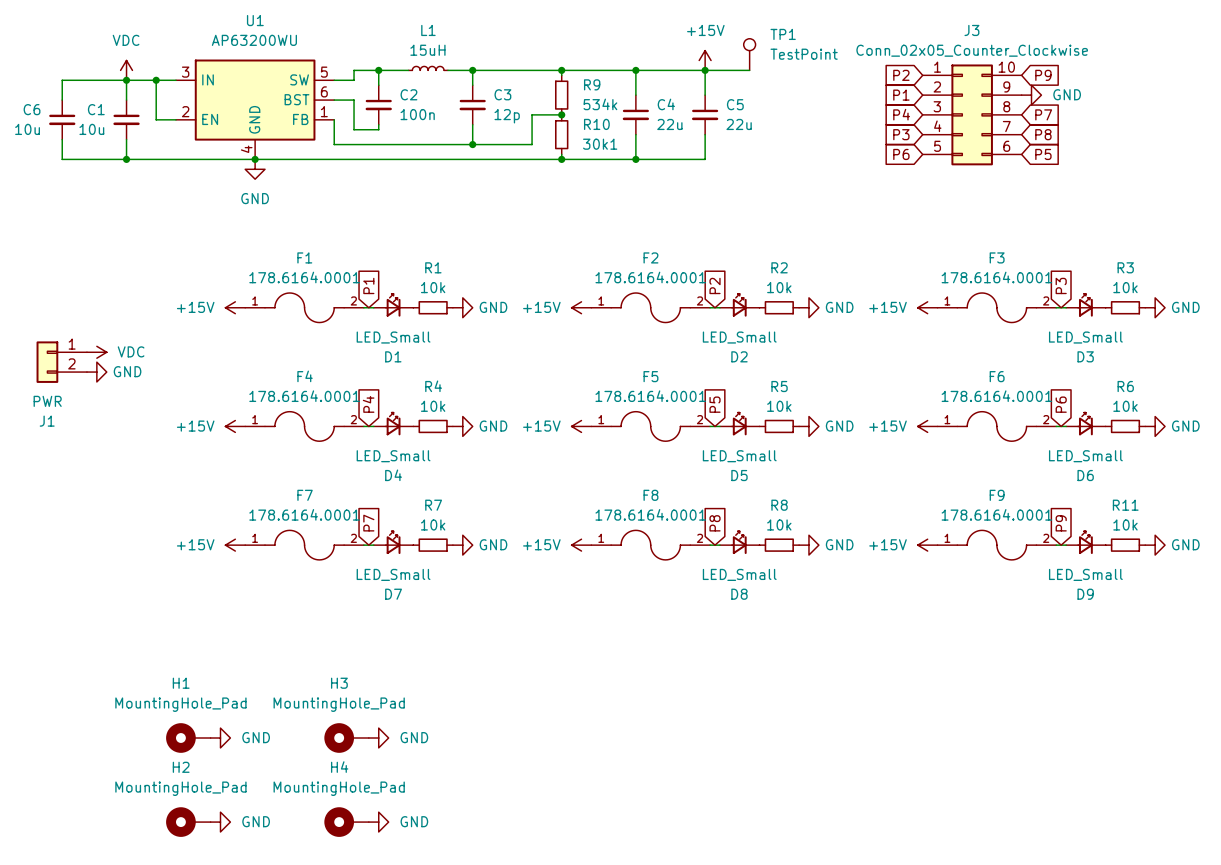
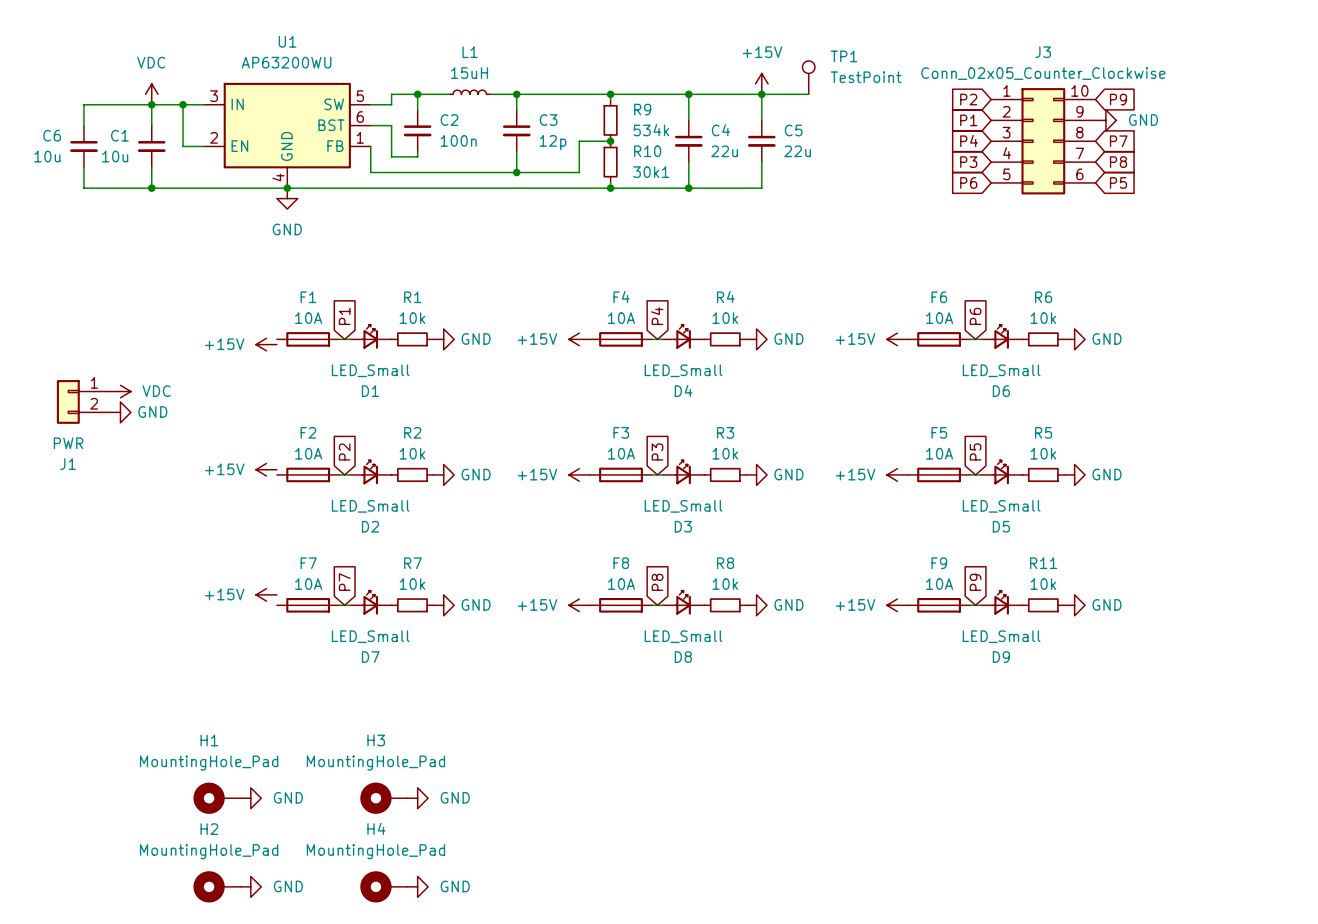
F1 value: 178.6164.0001 (304, 277) -> 10A (308, 318)
F2 value: 178.6164.0001 (650, 277) -> 10A (308, 453)
F3 value: 178.6164.0001 (996, 277) -> 10A (621, 453)
global label: none -> P4 (657, 316)
global label: none -> P6 (975, 316)
global label position: P1 (368, 285) -> P1 (344, 316)
global label: P2 (715, 285) -> none
global label: P3 (1061, 285) -> none
F1 symbol: [245, 292, 364, 324] -> [276, 332, 340, 347]
F2 symbol: [591, 292, 711, 324] -> [276, 467, 340, 483]
F3 symbol: [937, 292, 1057, 324] -> [589, 467, 653, 483]
power symbol: none -> GND (756, 339)
power symbol: none -> +15V (897, 339)
power symbol: none -> GND (1074, 339)
D1 position: (393, 305) -> (370, 336)
D2 position: (739, 305) -> (370, 472)
D3 position: (1085, 305) -> (683, 472)
wire: (363, 307) (373, 307) -> (339, 339) (349, 339)
R1 position: (433, 307) -> (412, 339)
power symbol position: GND (462, 307) -> GND (443, 339)
power symbol position: +15V (581, 307) -> +15V (579, 339)
wire: (710, 307) (719, 307) -> (652, 339) (662, 339)
R2 position: (779, 307) -> (412, 474)
power symbol: GND (808, 307) -> none
power symbol: +15V (927, 307) -> none
wire: (1056, 307) (1066, 307) -> (970, 339) (980, 339)
R3 position: (1125, 307) -> (725, 474)
power symbol: GND (1155, 307) -> none
F4 value: 178.6164.0001 (304, 396) -> 10A (621, 318)
F5 value: 178.6164.0001 (650, 396) -> 10A (939, 453)
F6 value: 178.6164.0001 (996, 396) -> 10A (939, 318)
global label: P4 (368, 404) -> none
global label position: P5 (715, 404) -> P5 (975, 451)
global label: P6 (1061, 404) -> none
global label: none -> P2 (344, 451)
global label: none -> P3 (657, 451)
F4 symbol: [245, 411, 364, 442] -> [589, 332, 653, 347]
F5 symbol: [591, 411, 711, 442] -> [907, 467, 971, 483]
F6 symbol: [937, 411, 1057, 442] -> [907, 332, 971, 347]
D4 position: (393, 423) -> (683, 336)
D5 position: (739, 423) -> (1001, 472)
D6 position: (1085, 423) -> (1001, 336)
R4 position: (433, 426) -> (725, 339)
power symbol position: GND (462, 426) -> GND (443, 474)
power symbol position: +15V (581, 426) -> +15V (579, 474)
wire: (710, 426) (719, 426) -> (652, 474) (662, 474)
R5 position: (779, 426) -> (1043, 474)
power symbol: GND (808, 426) -> none
power symbol: +15V (927, 426) -> none
wire: (1056, 426) (1066, 426) -> (970, 474) (980, 474)
R6 position: (1125, 426) -> (1043, 339)
power symbol: GND (1155, 426) -> none
power symbol: none -> GND (756, 474)
power symbol: none -> +15V (897, 474)
power symbol: none -> GND (1074, 474)
F7 value: 178.6164.0001 (304, 514) -> 10A (308, 584)
F8 value: 178.6164.0001 (650, 514) -> 10A (621, 584)
F9 value: 178.6164.0001 (996, 514) -> 10A (939, 584)
global label position: P7 (368, 523) -> P7 (344, 582)
global label position: P8 (715, 523) -> P8 (657, 582)
global label position: P9 (1061, 523) -> P9 (975, 582)
F7 symbol: [245, 529, 364, 561] -> [276, 598, 340, 613]
F8 symbol: [591, 529, 711, 561] -> [589, 598, 653, 613]
F9 symbol: [937, 529, 1057, 561] -> [907, 598, 971, 613]
D7 position: (393, 542) -> (370, 602)
D8 position: (739, 542) -> (683, 602)
D9 position: (1085, 542) -> (1001, 602)
wire: (363, 545) (373, 545) -> (339, 605) (349, 605)
R7 position: (433, 545) -> (412, 605)
power symbol position: GND (462, 545) -> GND (443, 605)
power symbol position: +15V (581, 545) -> +15V (579, 605)
wire: (710, 545) (719, 545) -> (652, 605) (662, 605)
R8 position: (779, 545) -> (725, 605)
power symbol: GND (808, 545) -> none
power symbol: +15V (927, 545) -> none
wire: (1056, 545) (1066, 545) -> (970, 605) (980, 605)
R11 position: (1125, 545) -> (1043, 605)
power symbol: GND (1155, 545) -> none
power symbol: none -> GND (756, 605)
power symbol: none -> +15V (897, 605)
power symbol: none -> GND (1074, 605)

